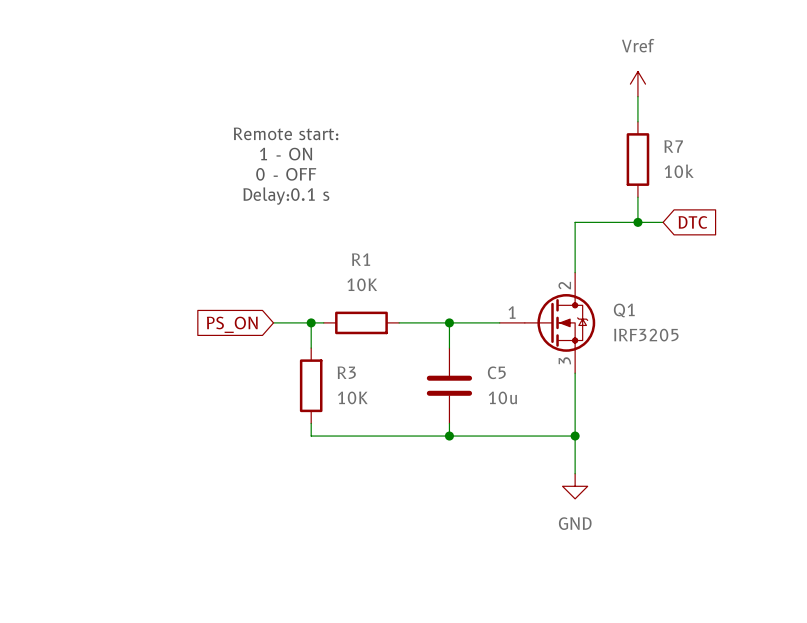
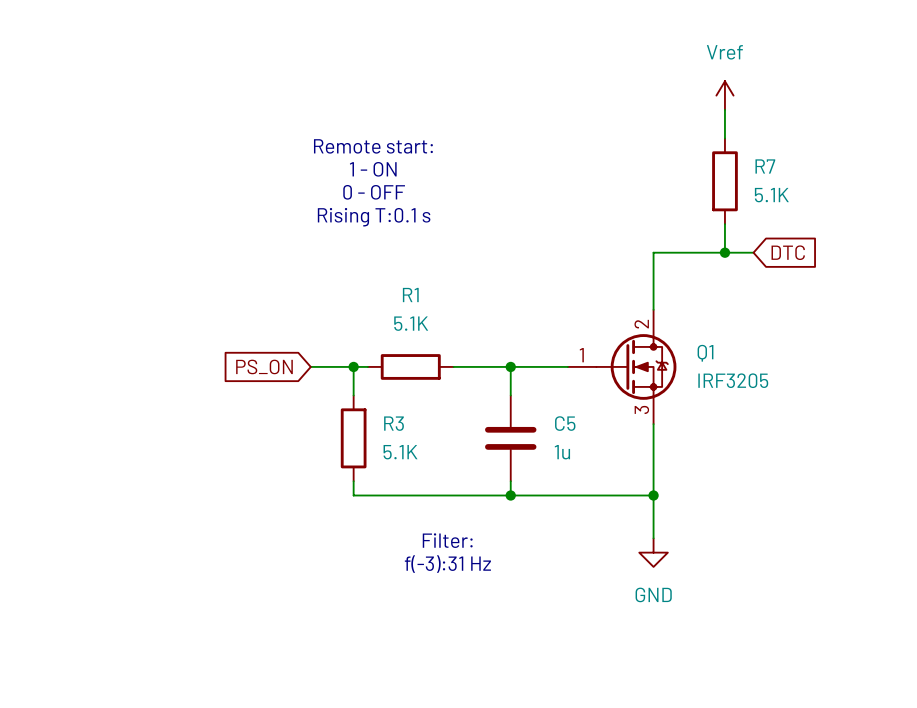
text position: Remote start: (286, 133) -> Remote start: (373, 146)
text position: 1 - ON (286, 154) -> 1 - ON (373, 169)
R7 value: 10k (679, 171) -> 5.1K (771, 195)
text position: 0 - OFF (286, 174) -> 0 - OFF (374, 192)
text: none -> Rising T:0.1 s (374, 217)
text: Delay:0.1 s (286, 196) -> none
R1 value: 10K (362, 284) -> 5.1K (411, 323)
R3 value: 10K (352, 397) -> 5.1K (400, 452)
C5 value: 10u (502, 397) -> 1u (562, 452)
text: none -> Filter: (447, 540)
text: none -> f(-3):31 Hz (447, 564)

